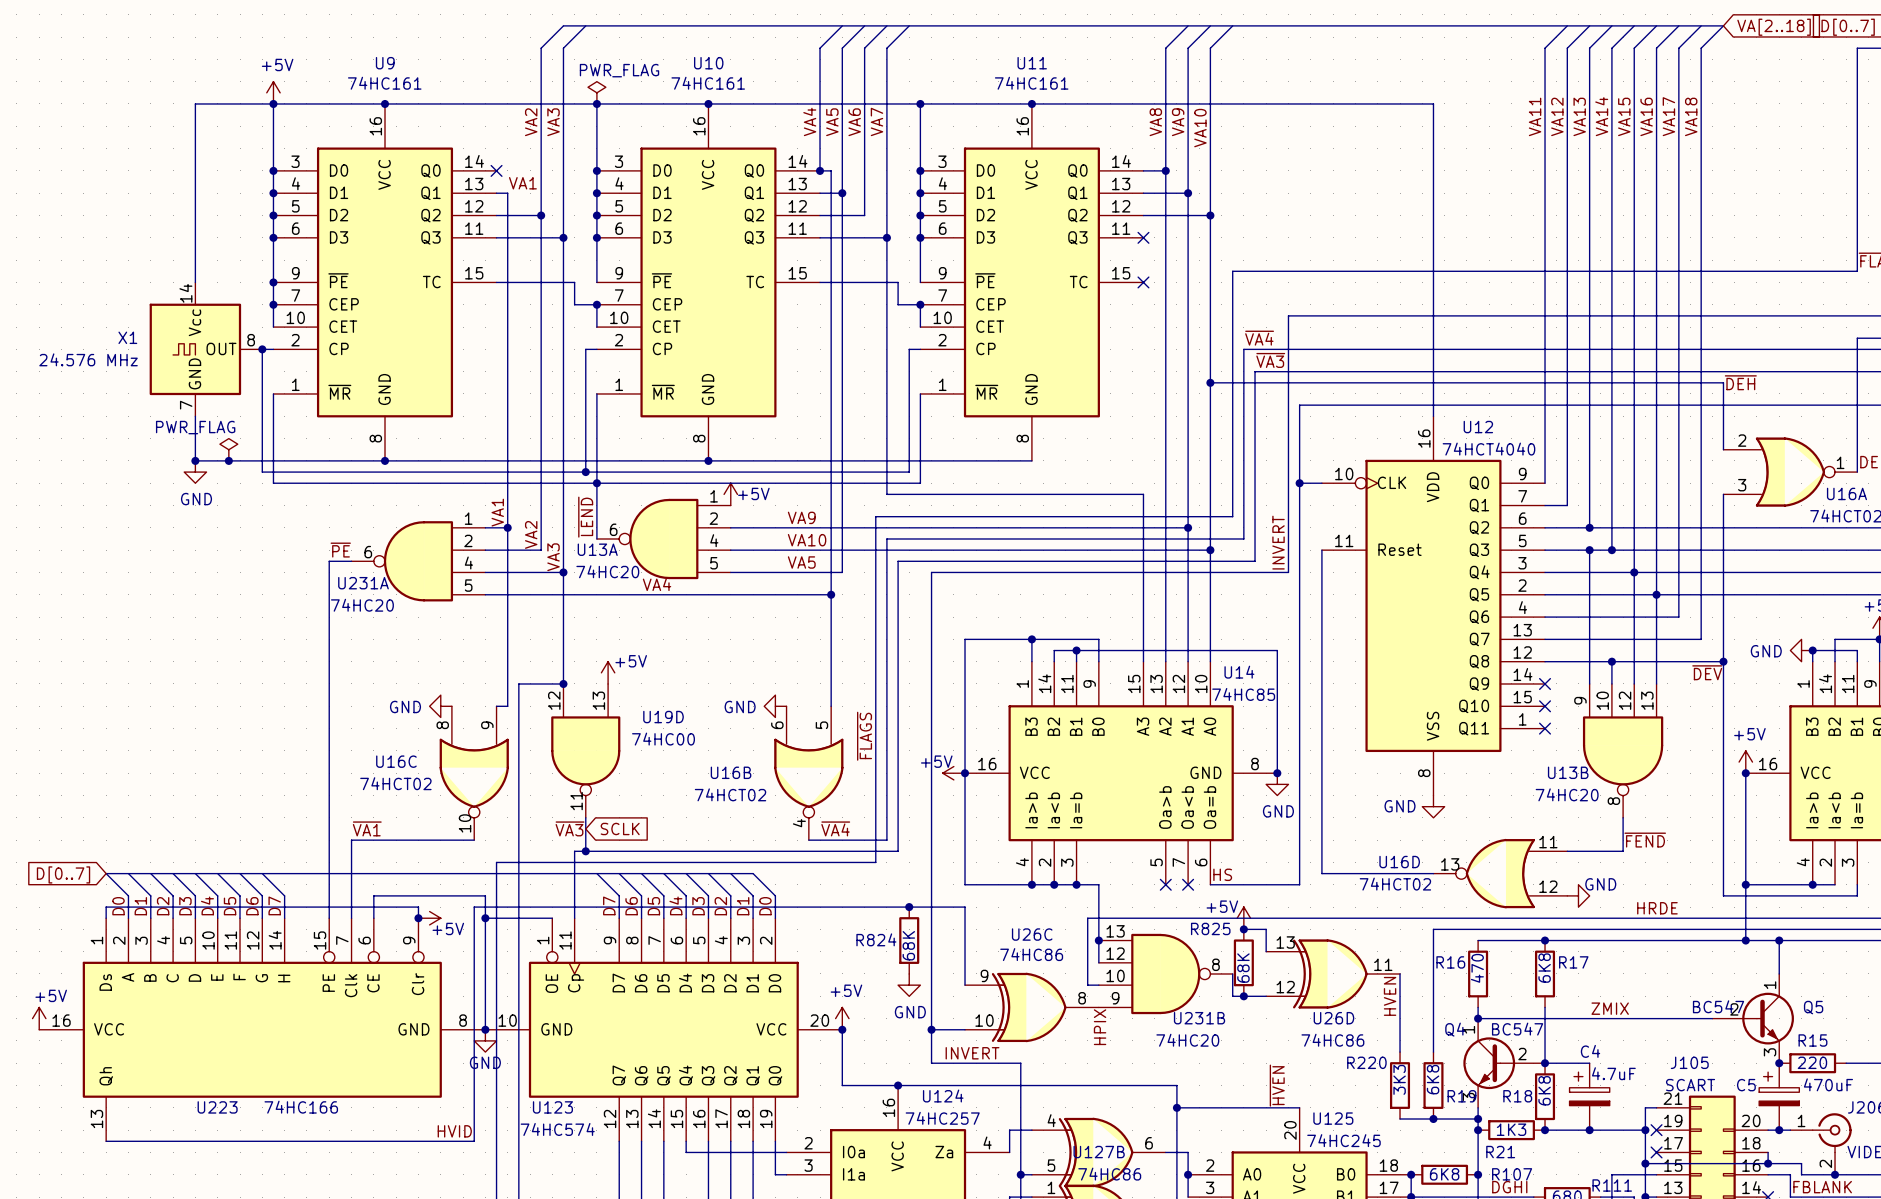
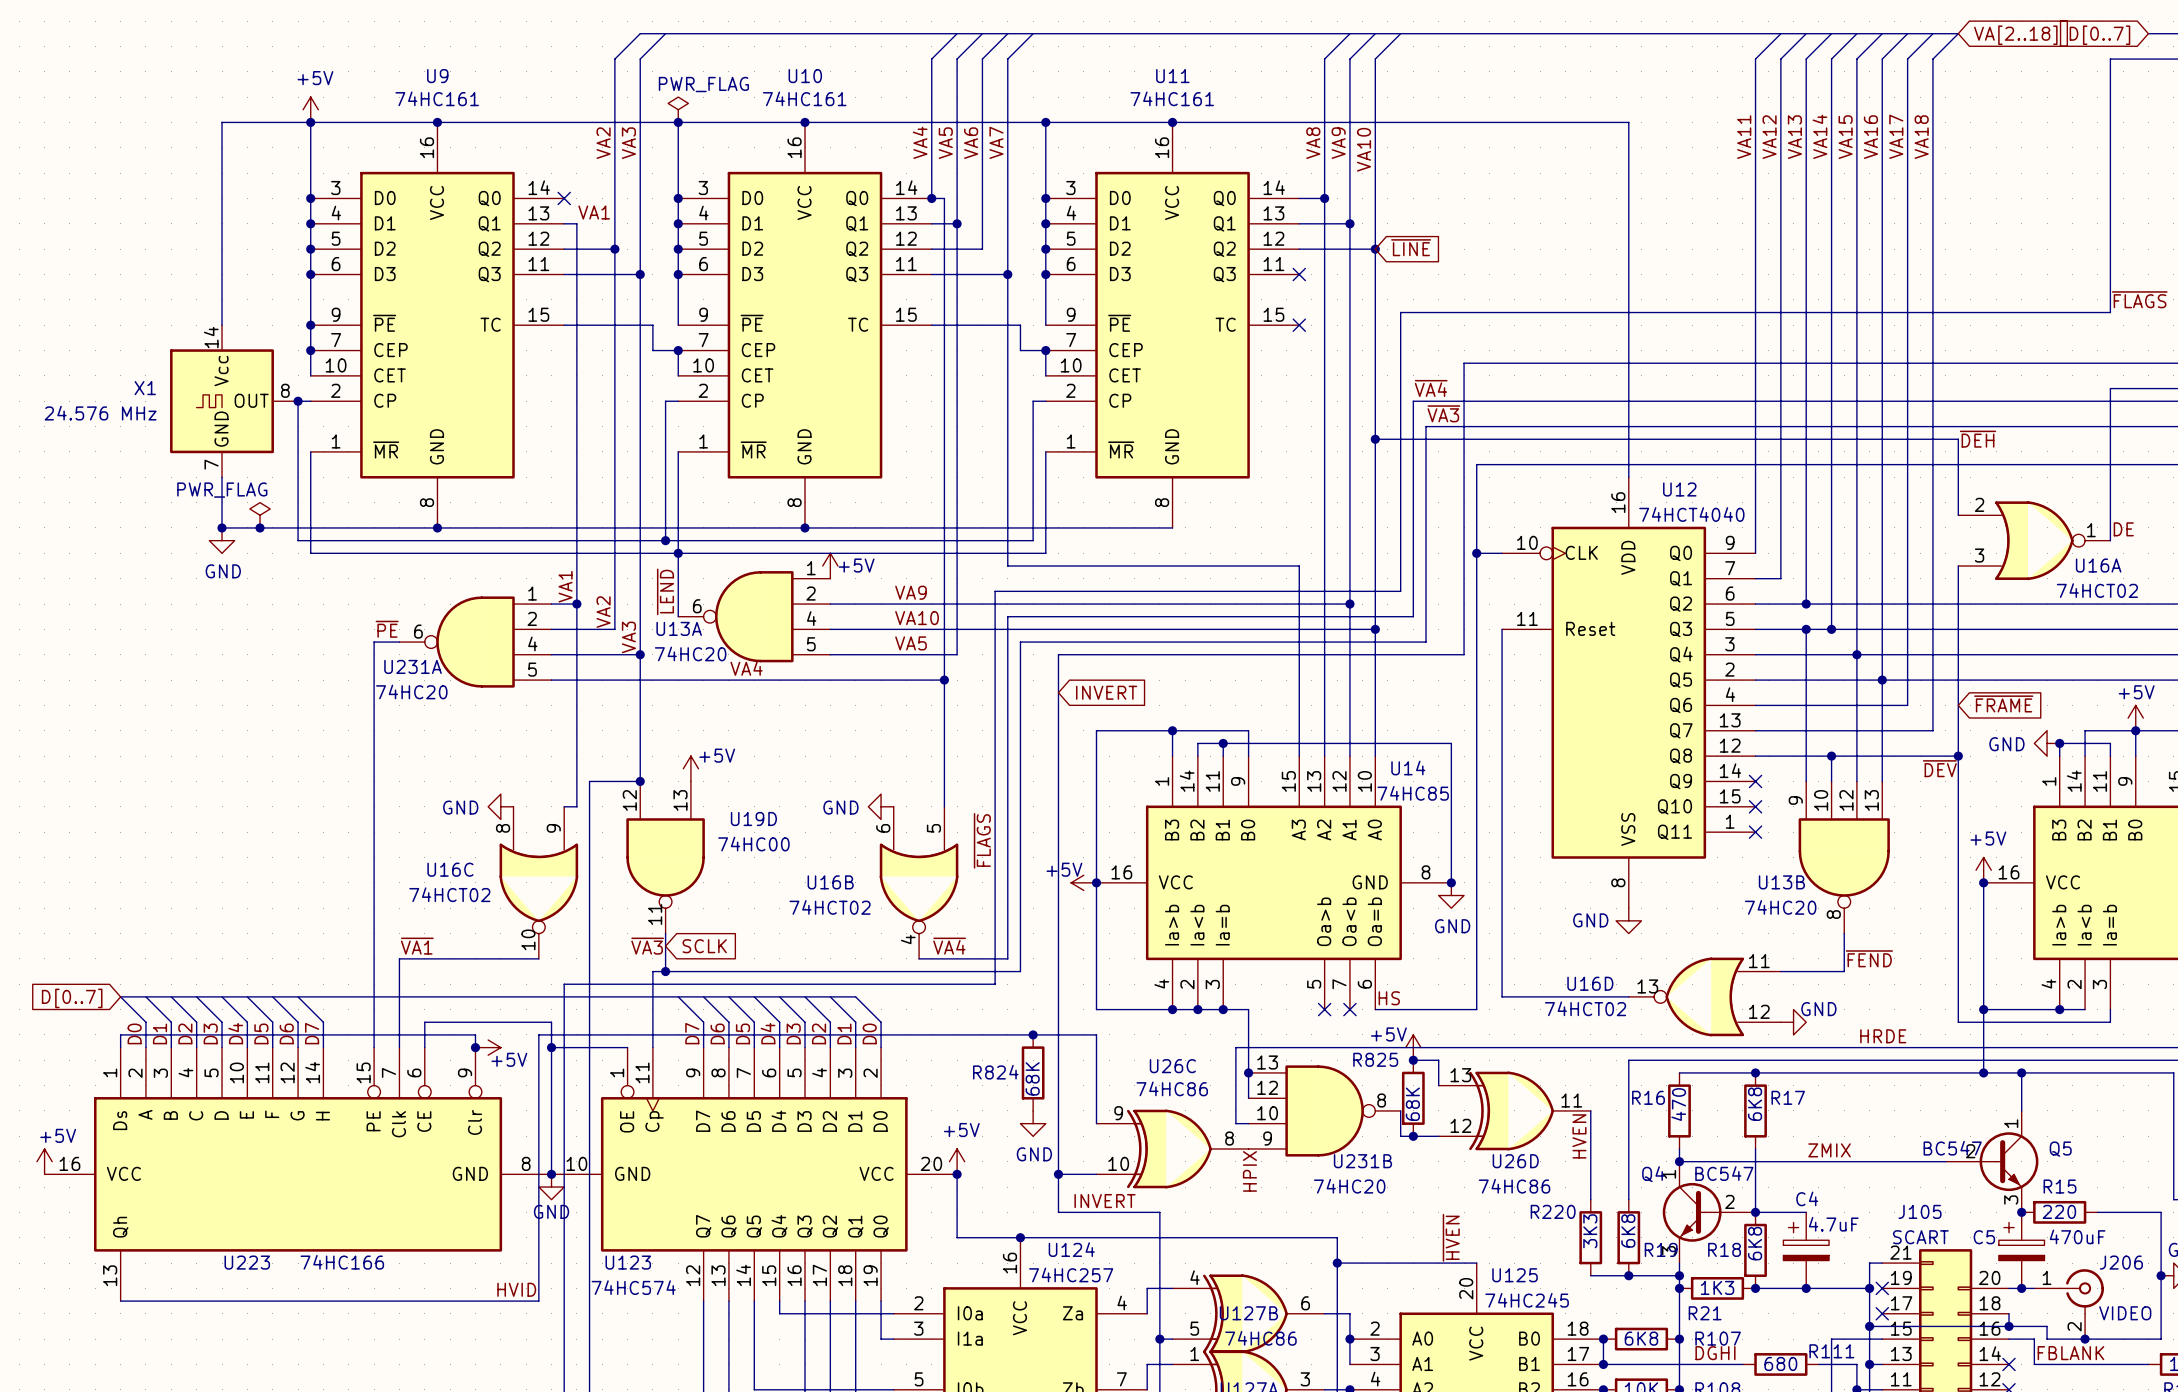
global label: none -> ~{LINE} (1411, 247)
label: INVERT (1278, 542) -> none
global label: none -> INVERT (1106, 692)
global label: none -> ~{FRAME} (2003, 703)

